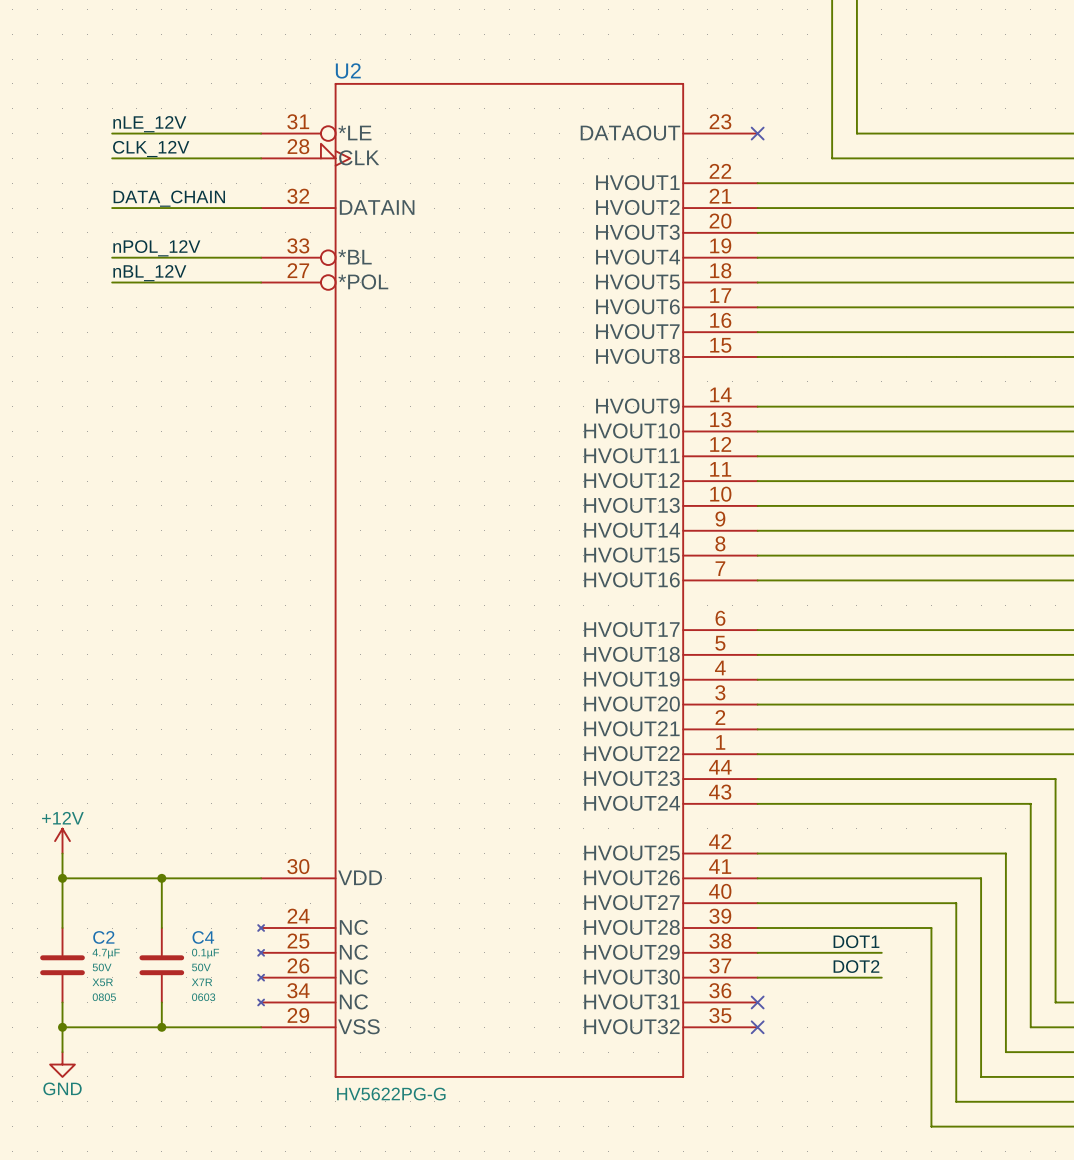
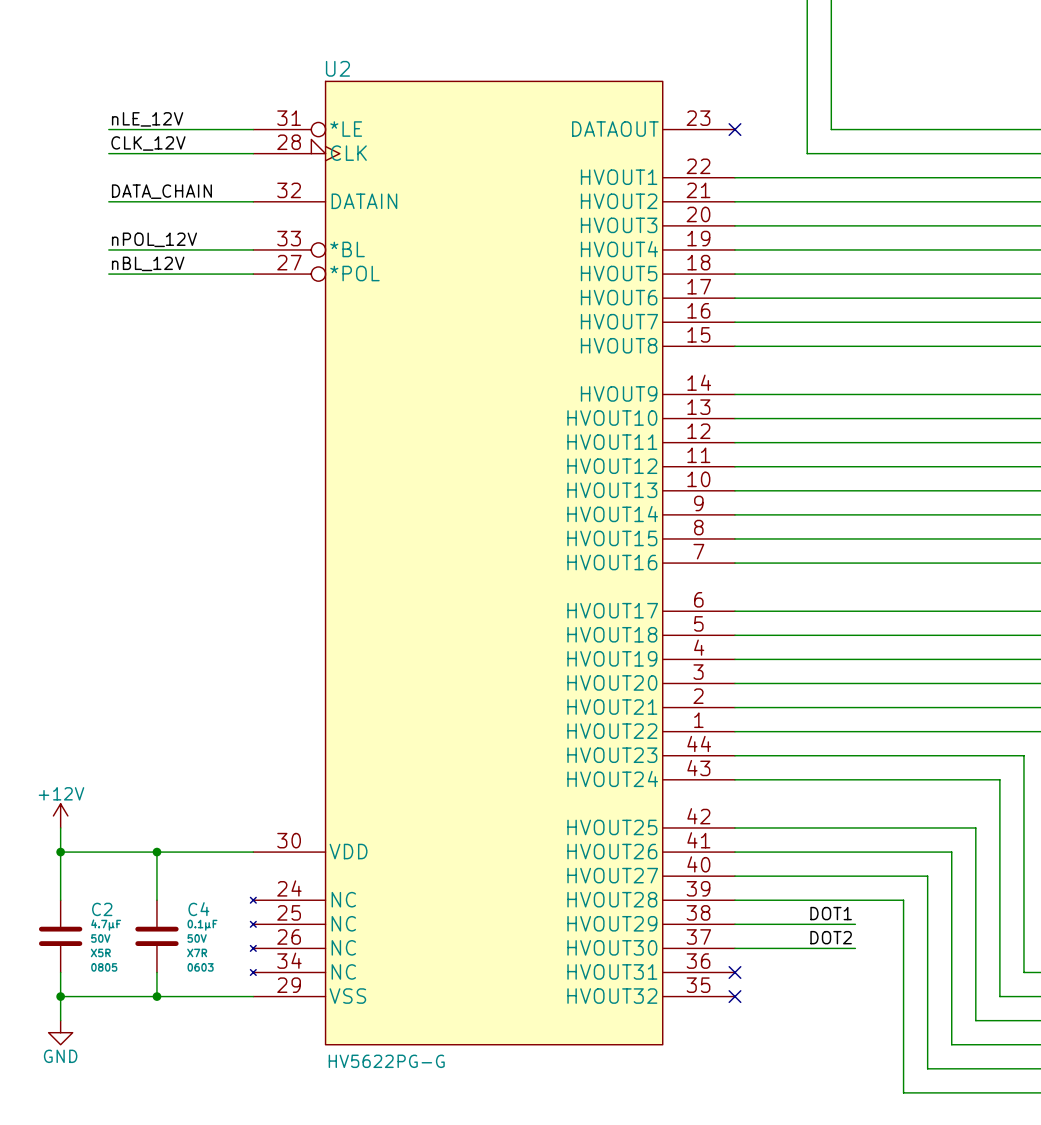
U2 symbol: [258, 83, 758, 1078] -> [250, 81, 735, 1045]

